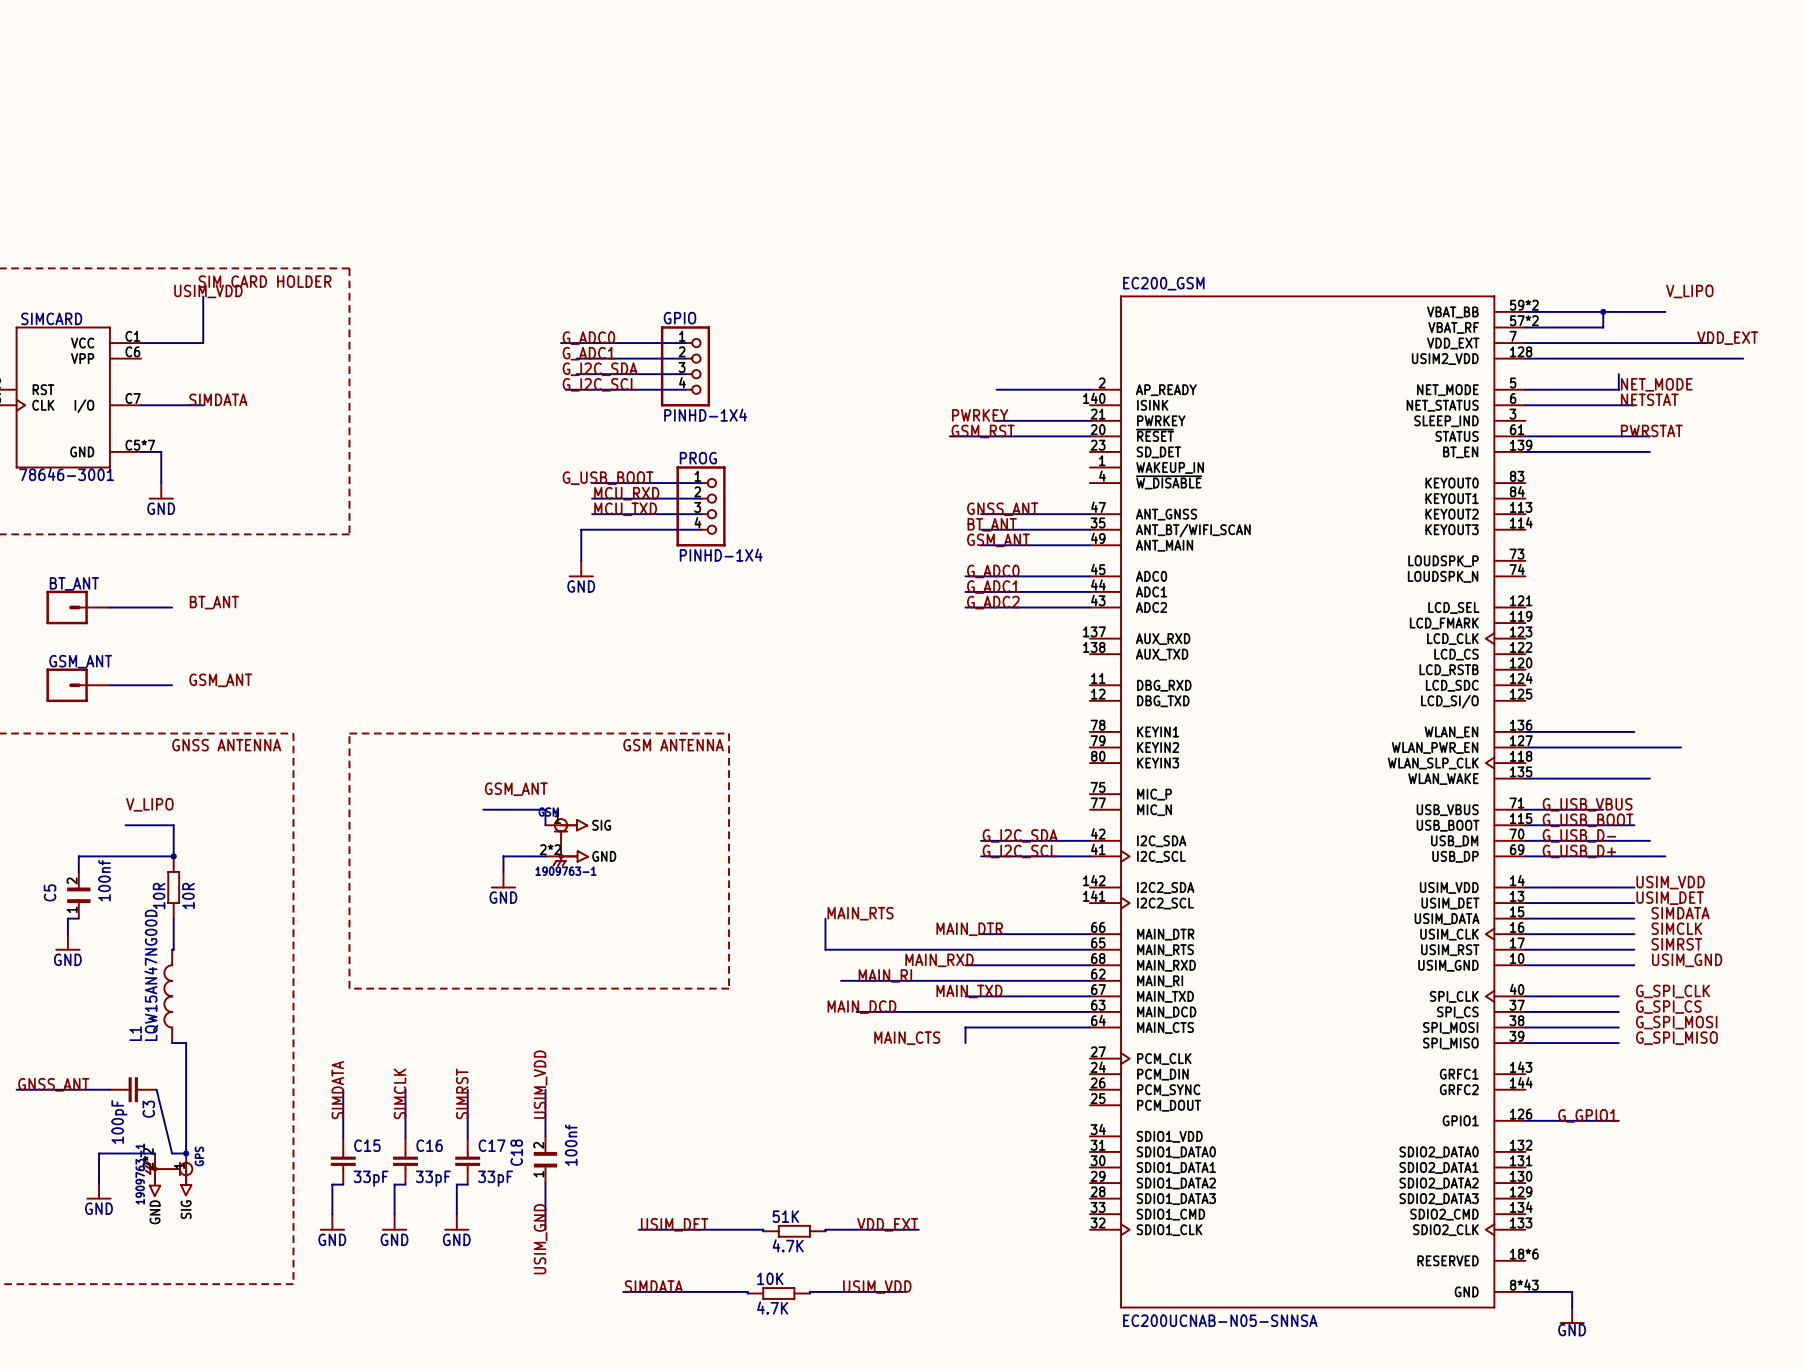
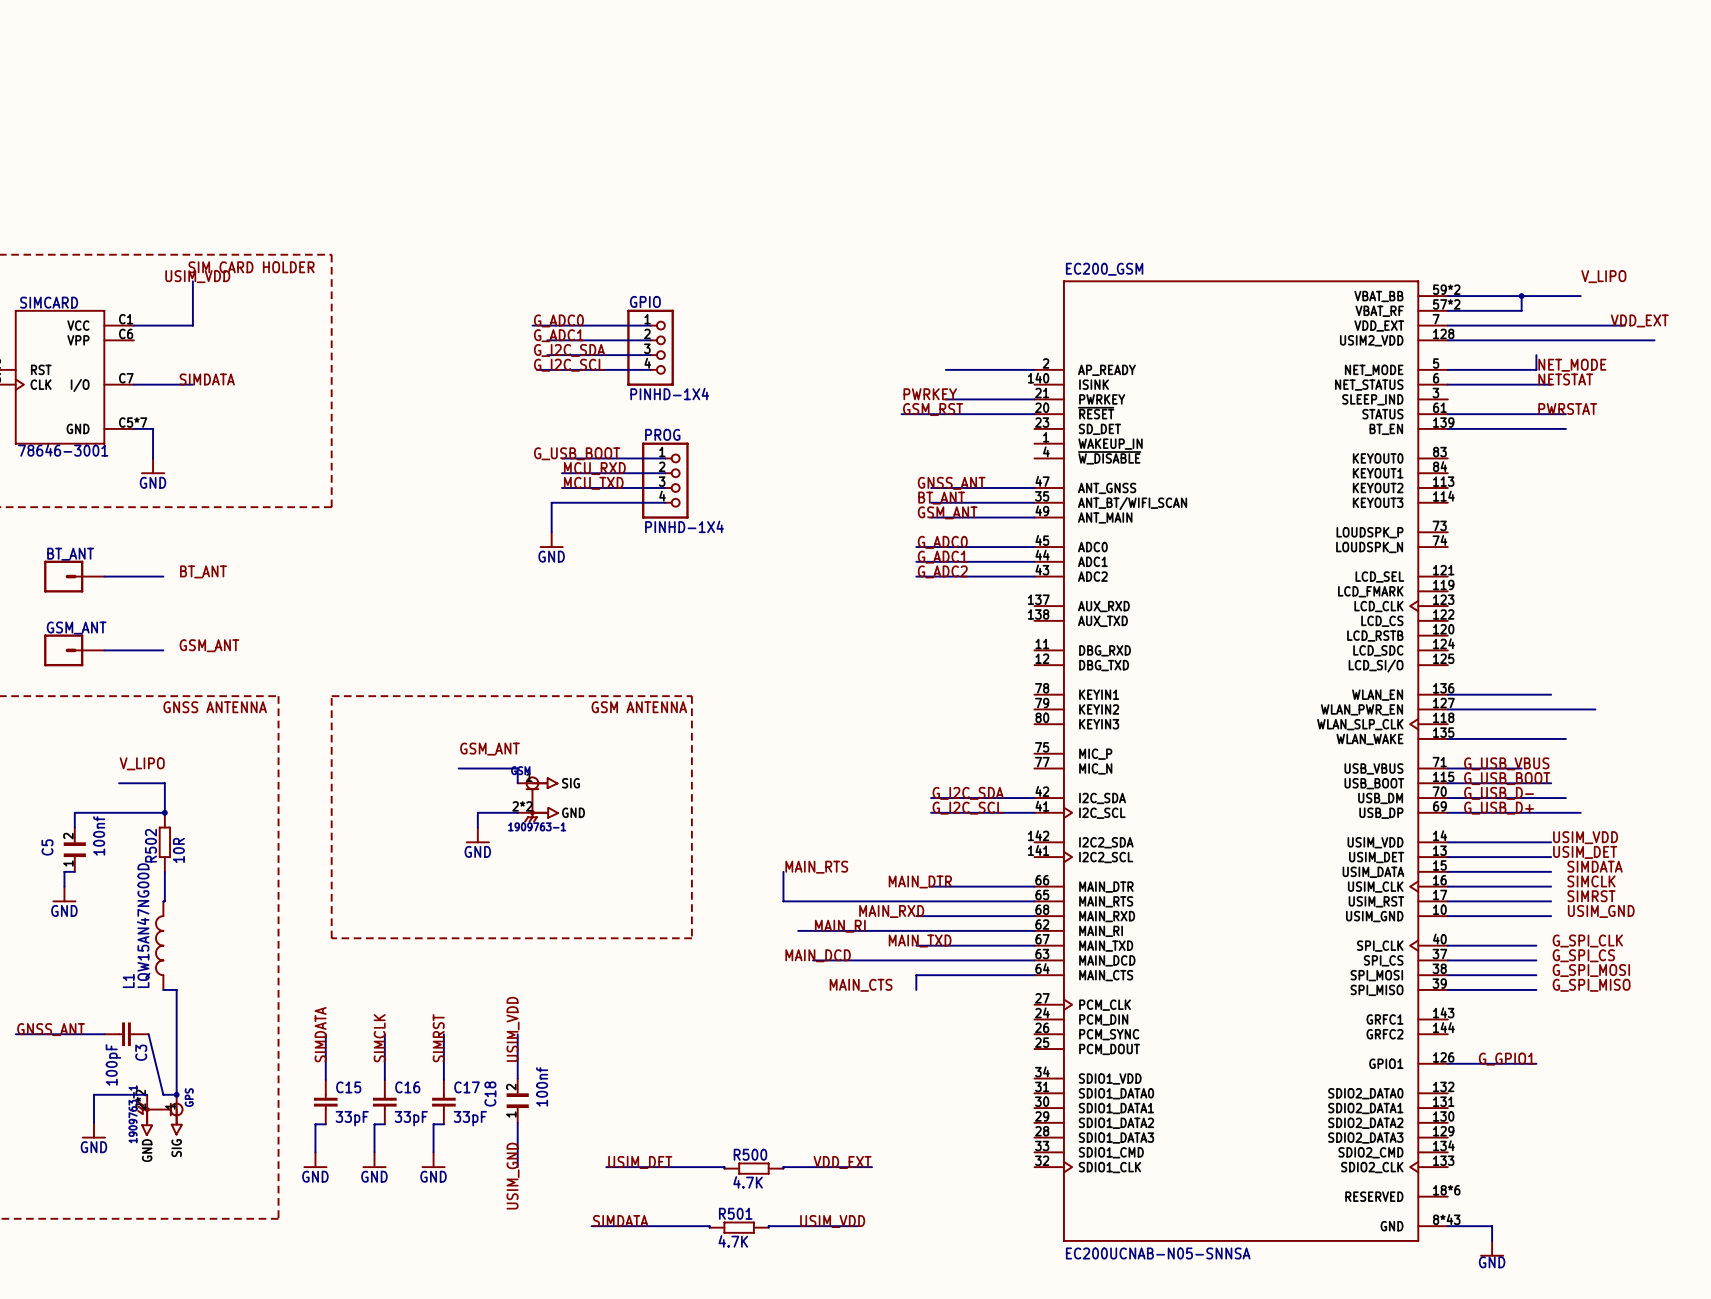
10R name: 10R (159, 896) -> R502 (150, 845)
51K name: 51K (785, 1216) -> R500 (750, 1154)
10K name: 10K (770, 1278) -> R501 (735, 1213)

